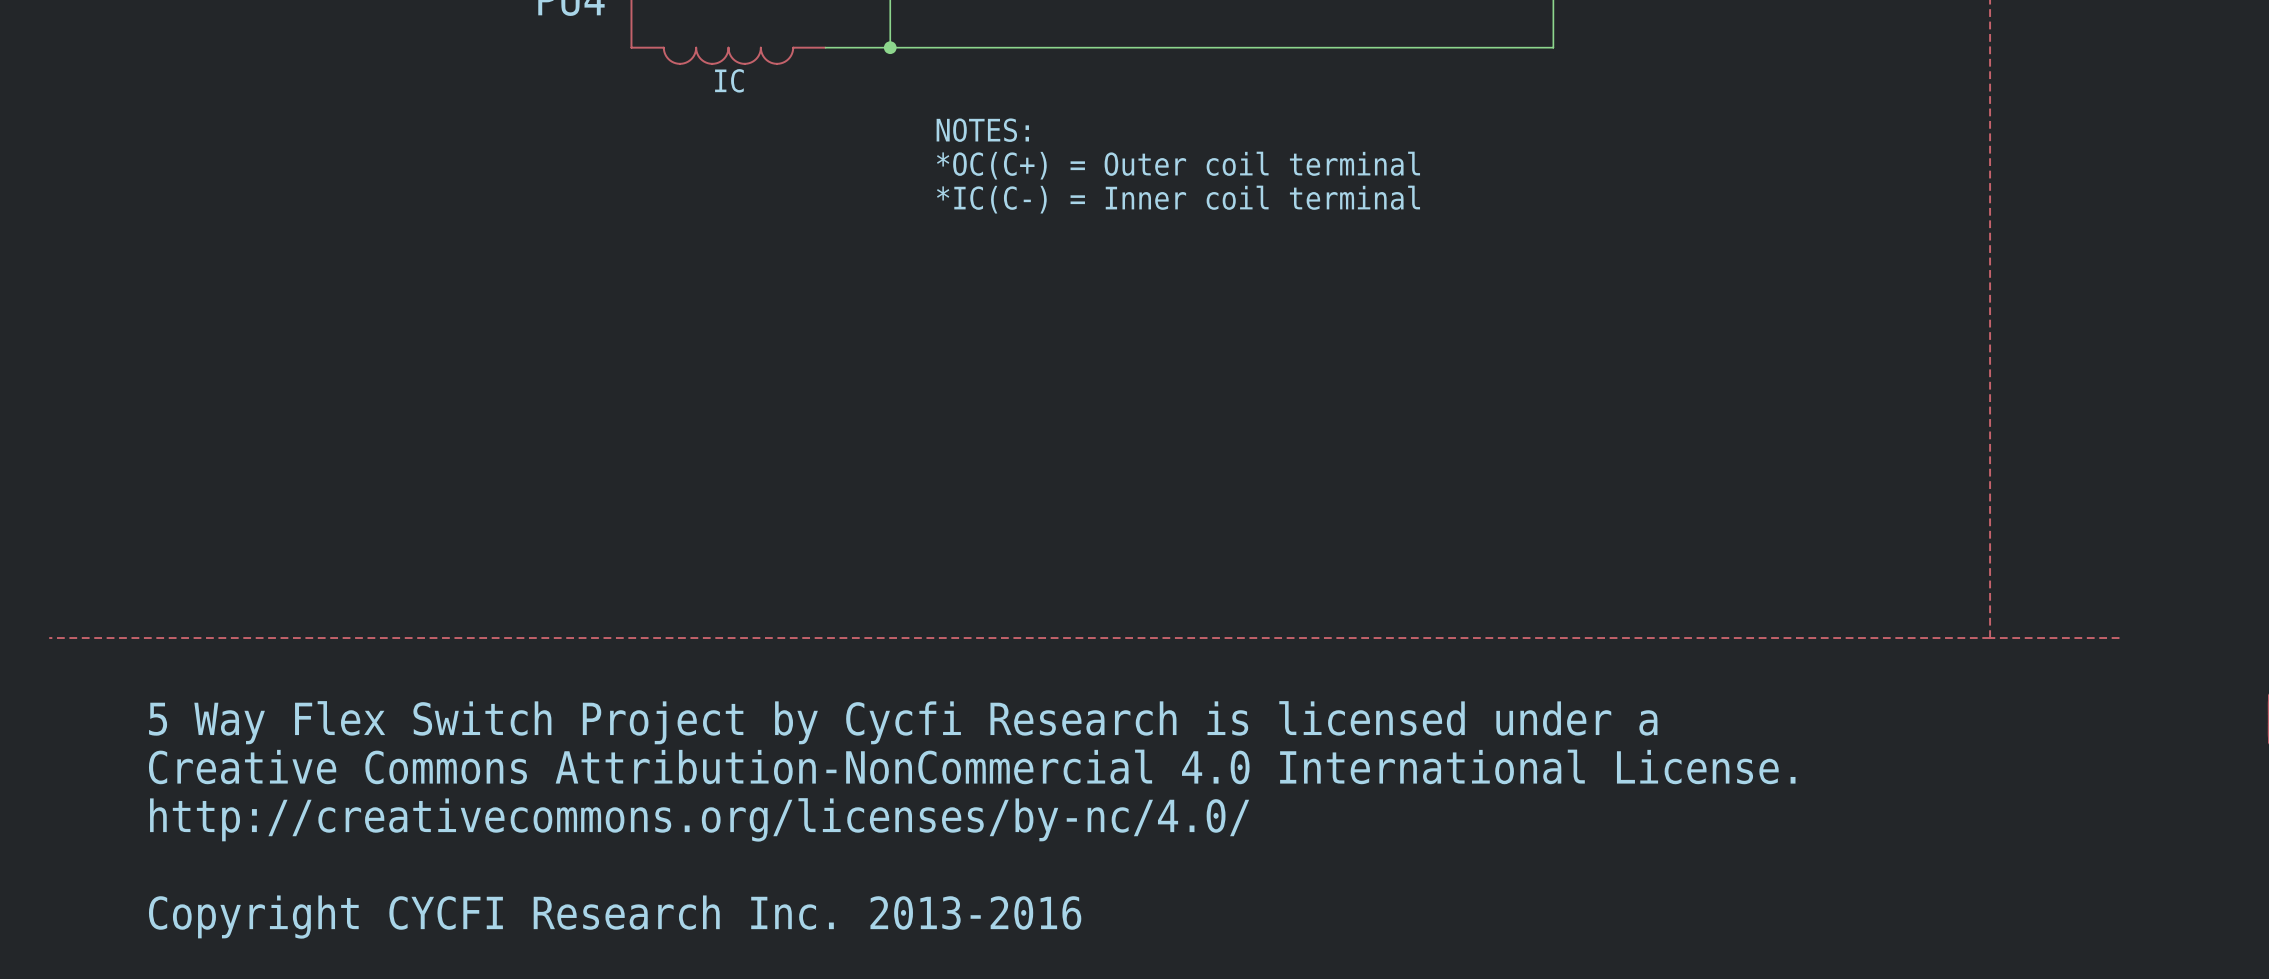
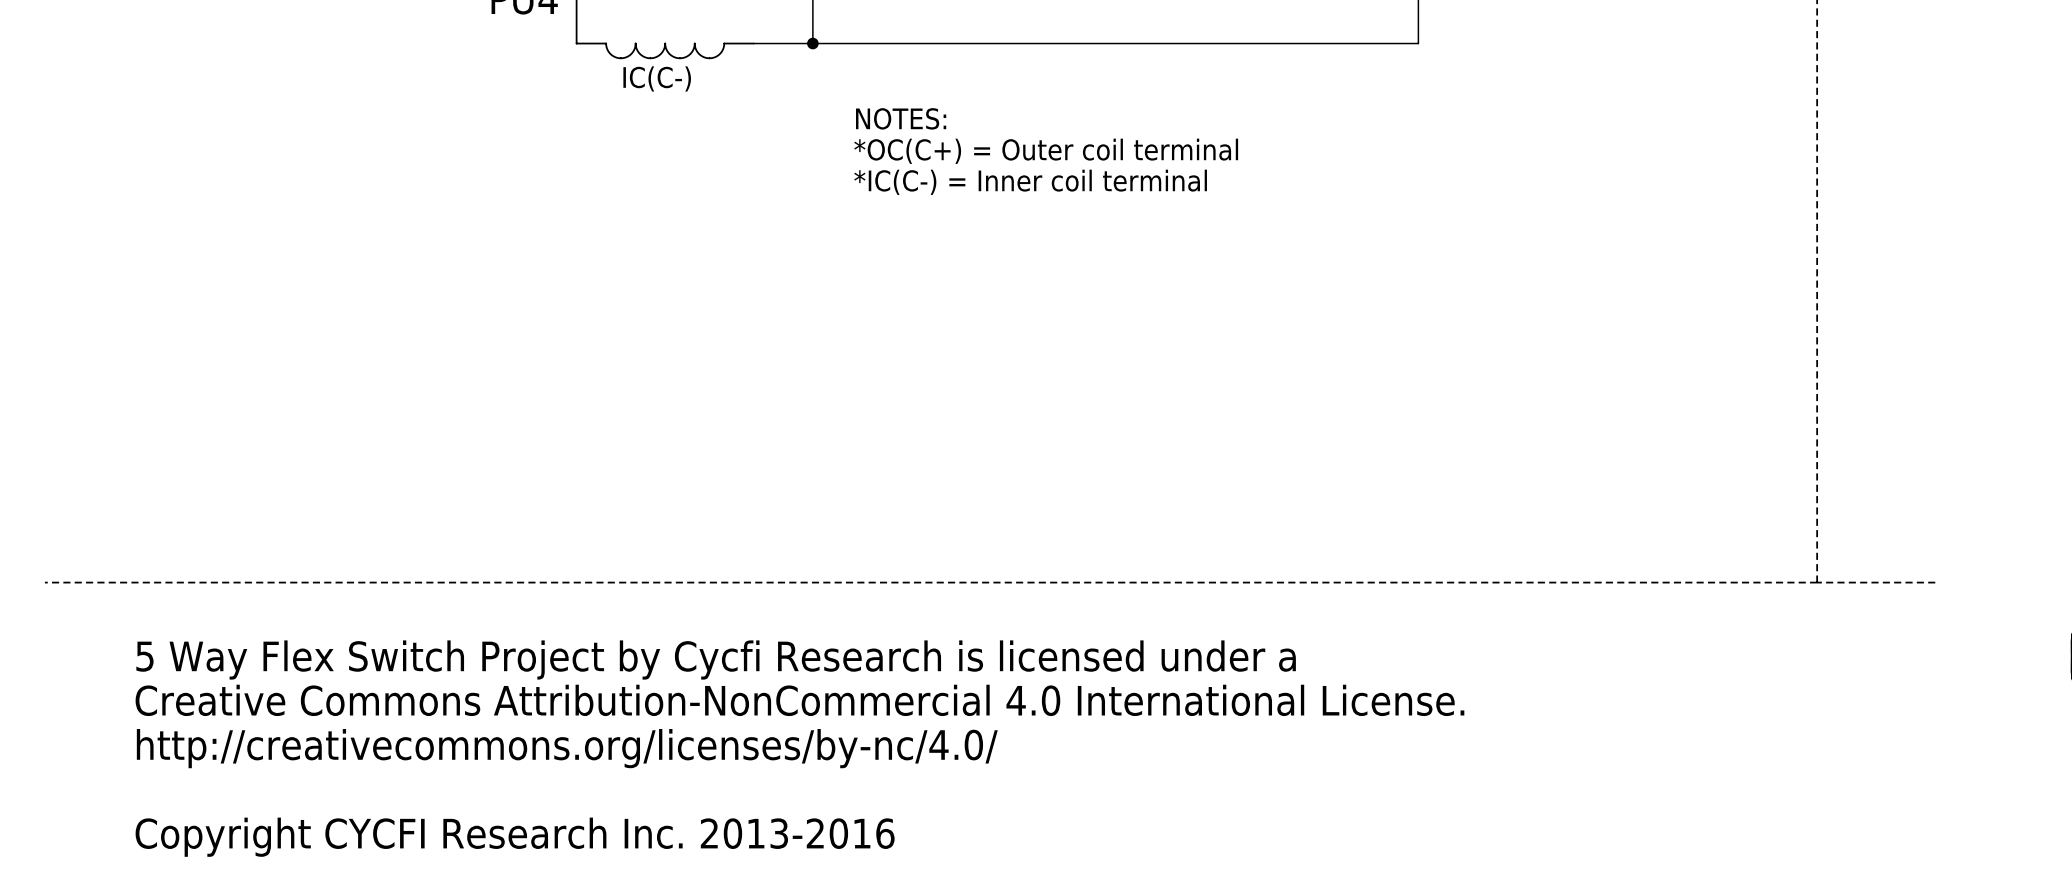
text: IC (729, 80) -> none
text: none -> IC(C-) (657, 78)

